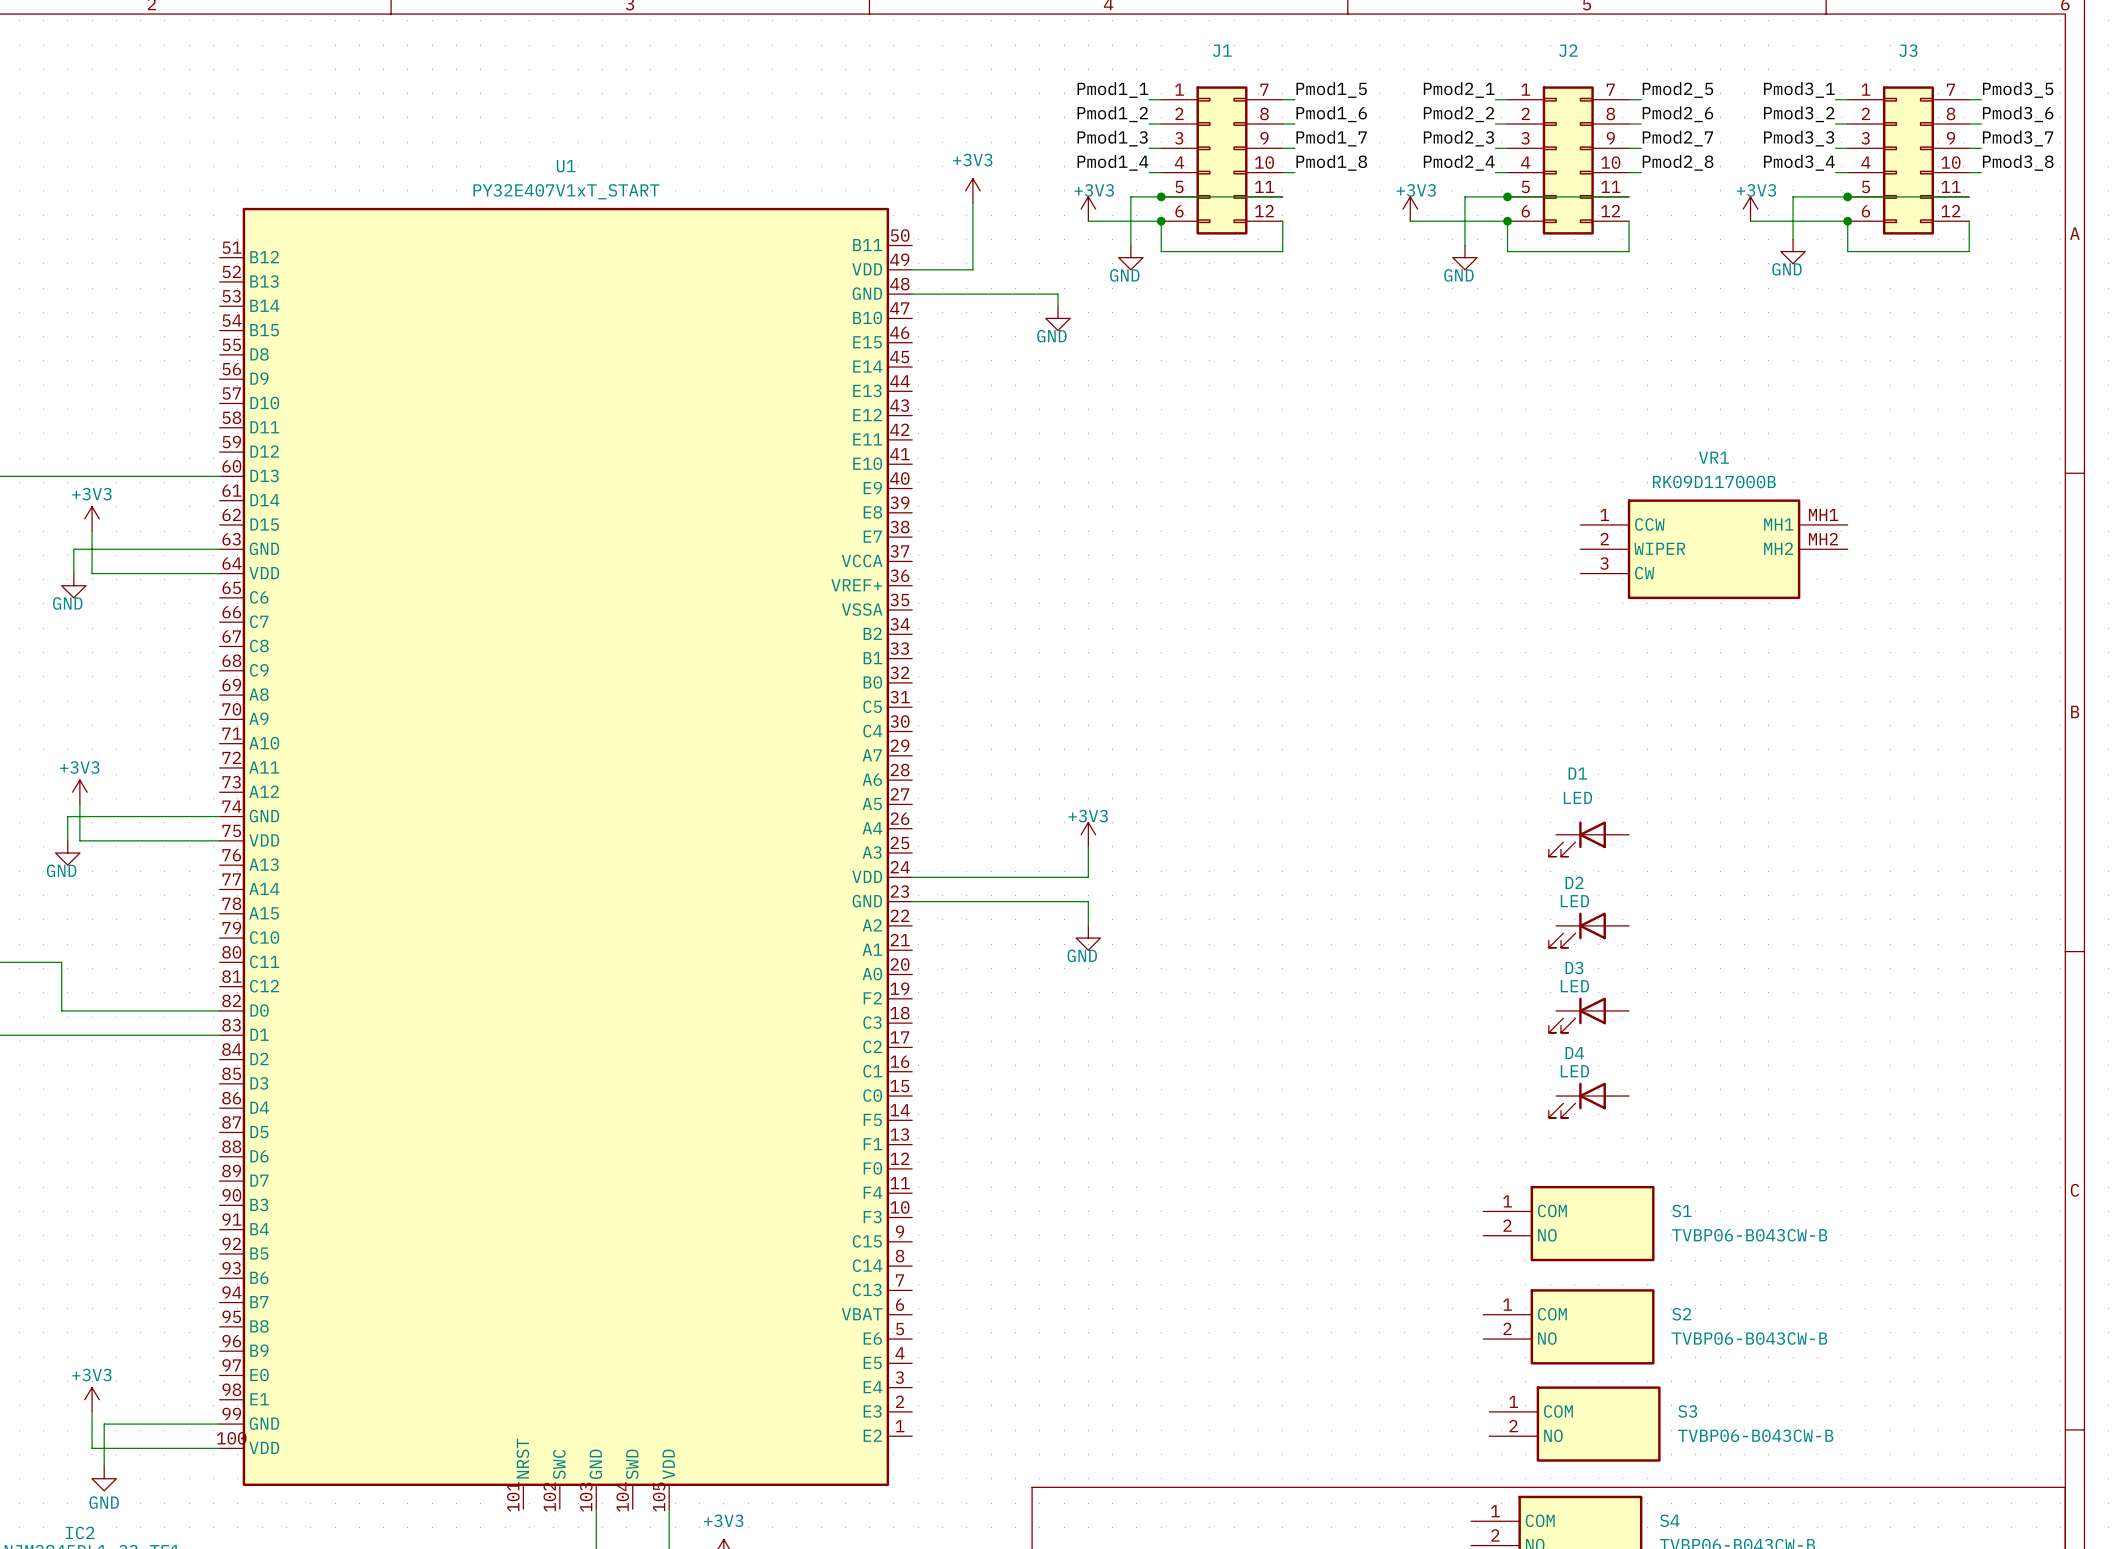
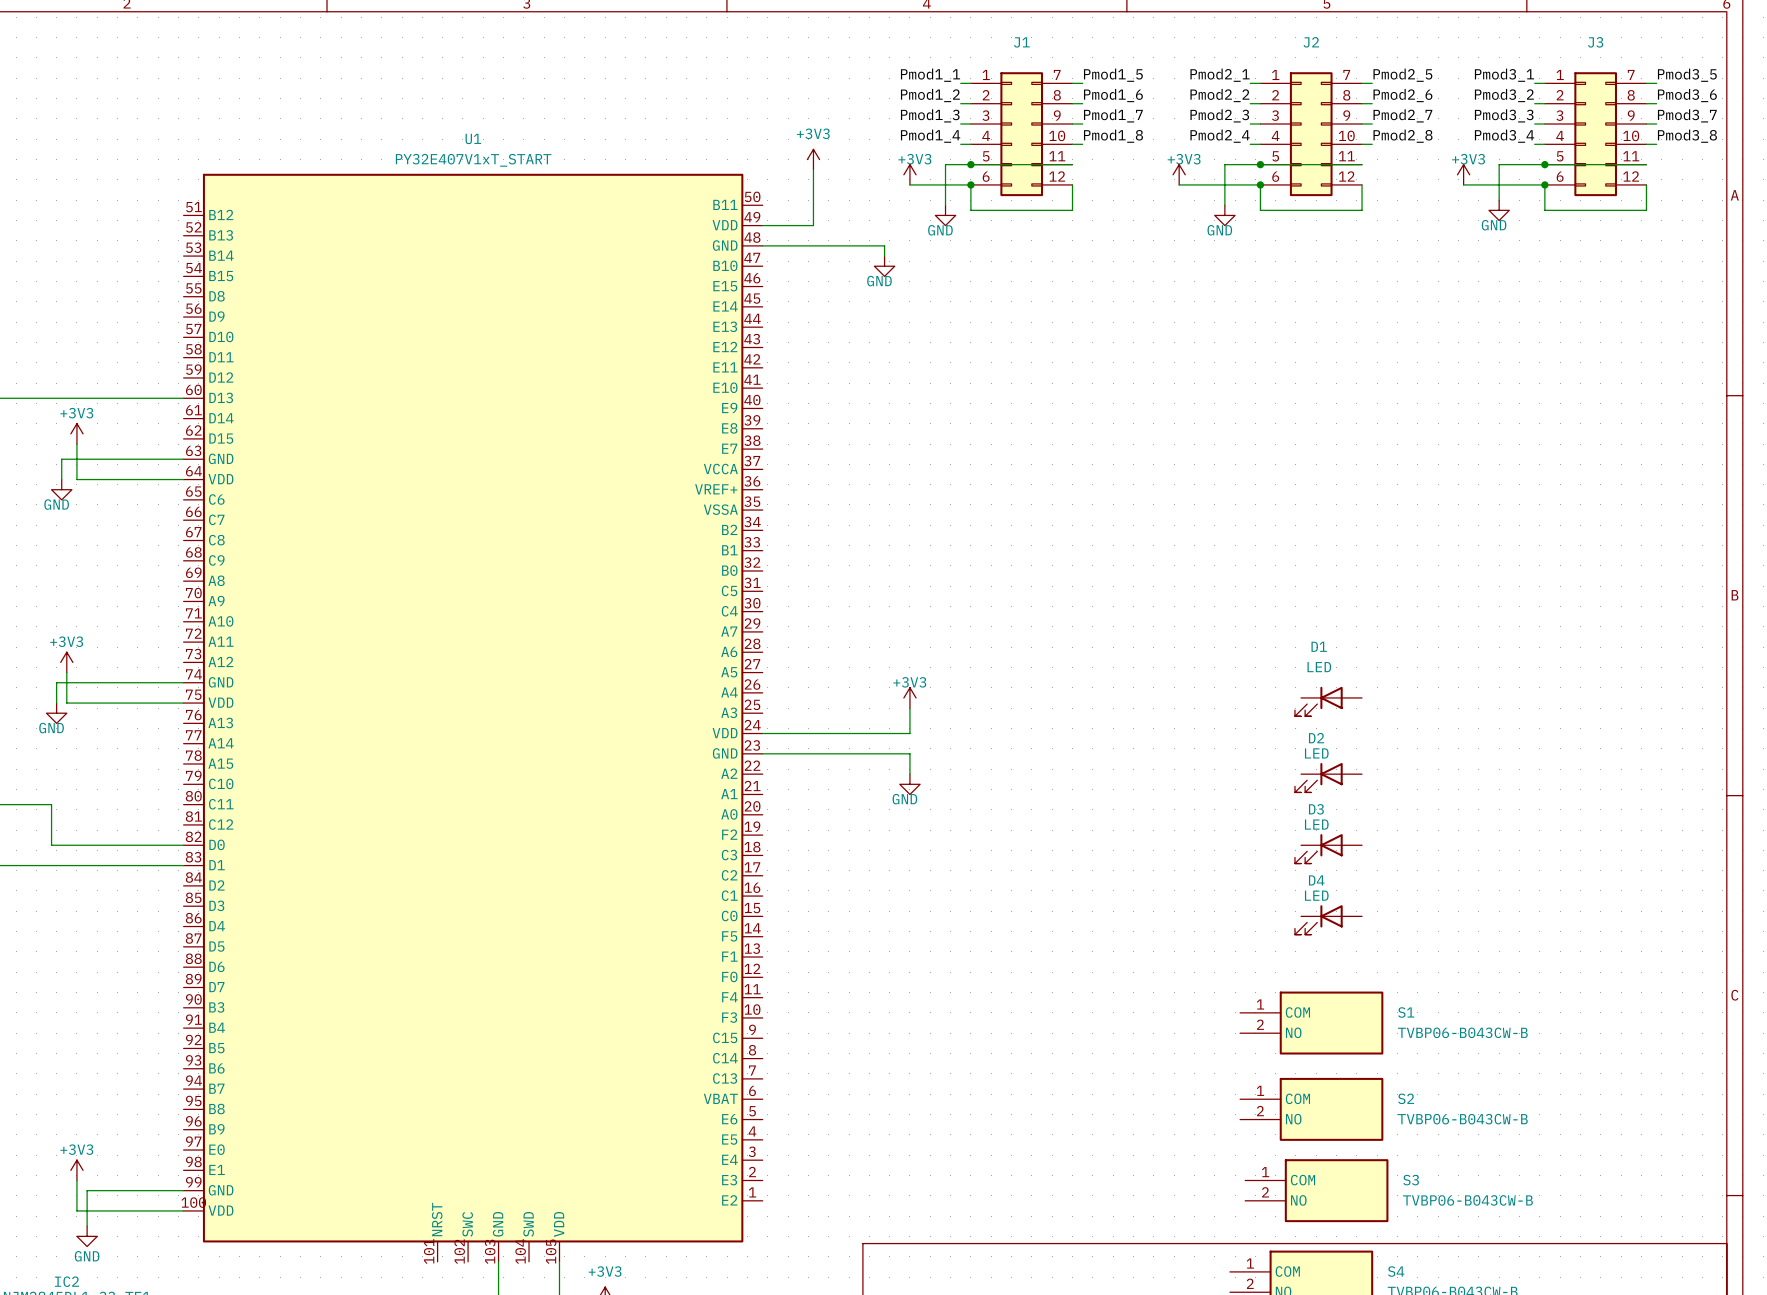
VR1: RK09D117000B (1714, 549) -> none

